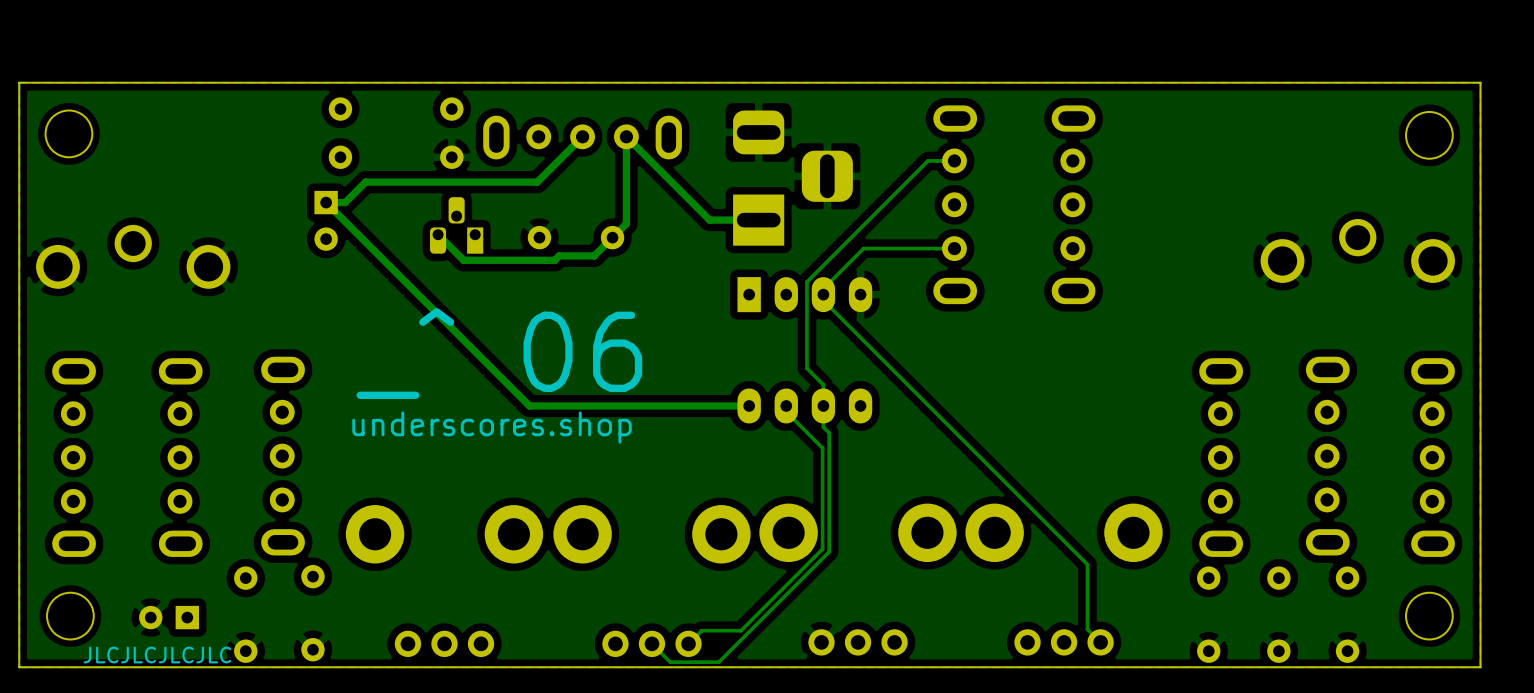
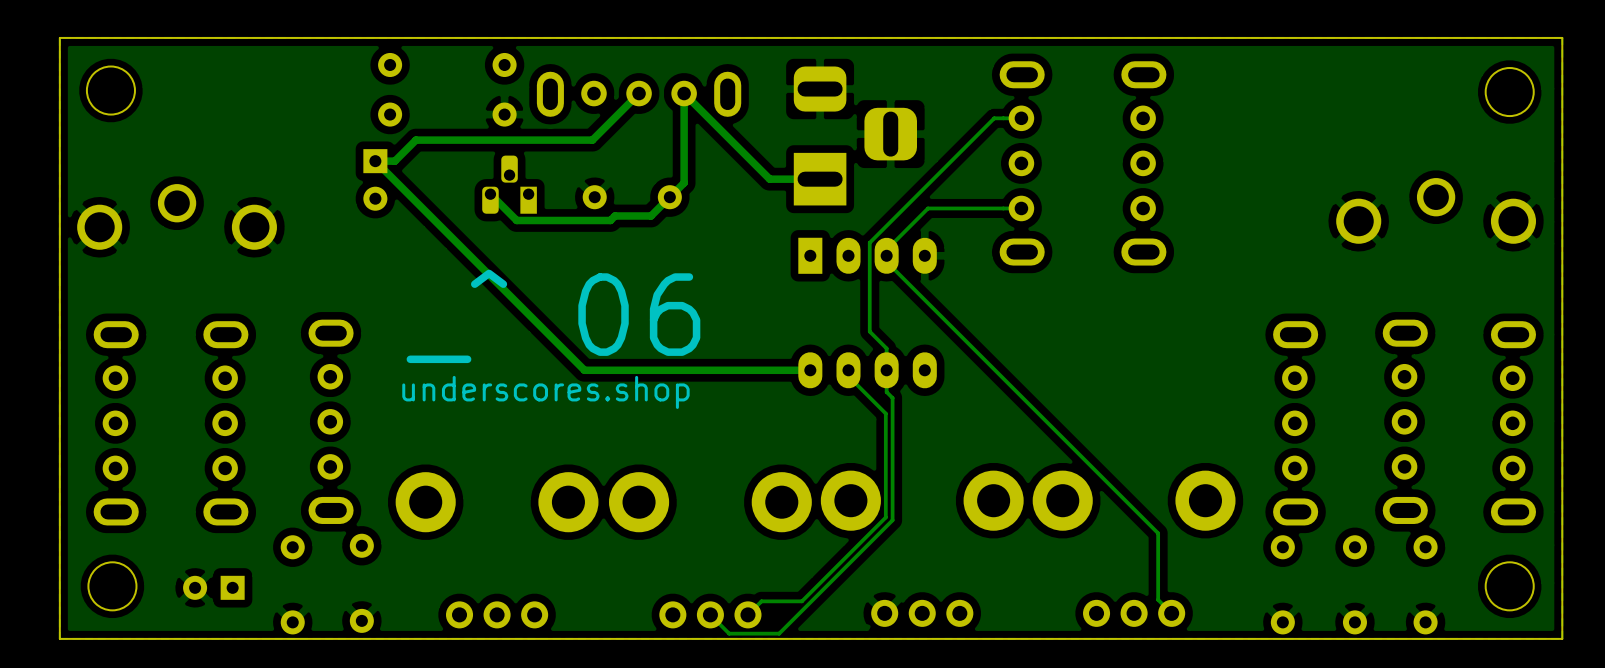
text: JLCJLCJLCJLC (157, 655) -> none

